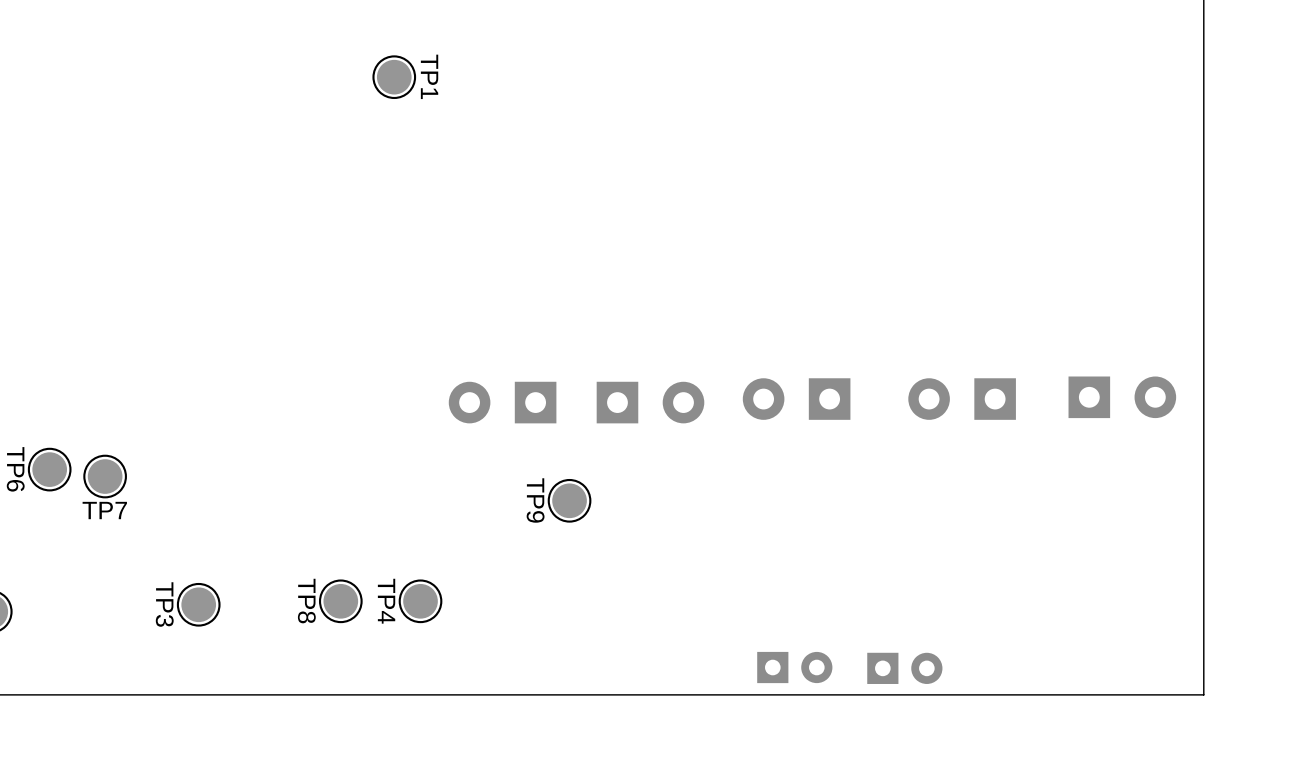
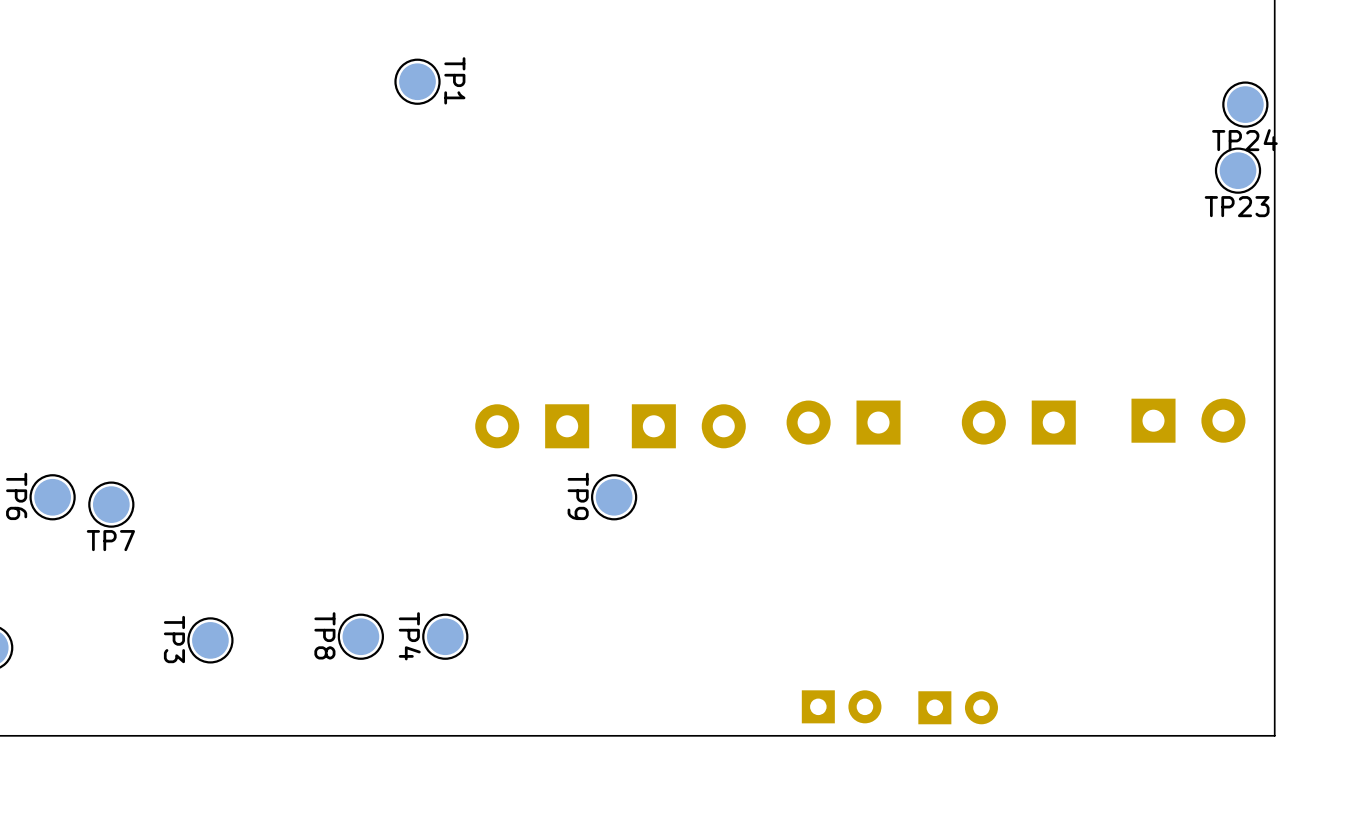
TP24: none -> (1245, 104)
TP23: none -> (1238, 170)
TP9 position: (569, 500) -> (614, 497)

